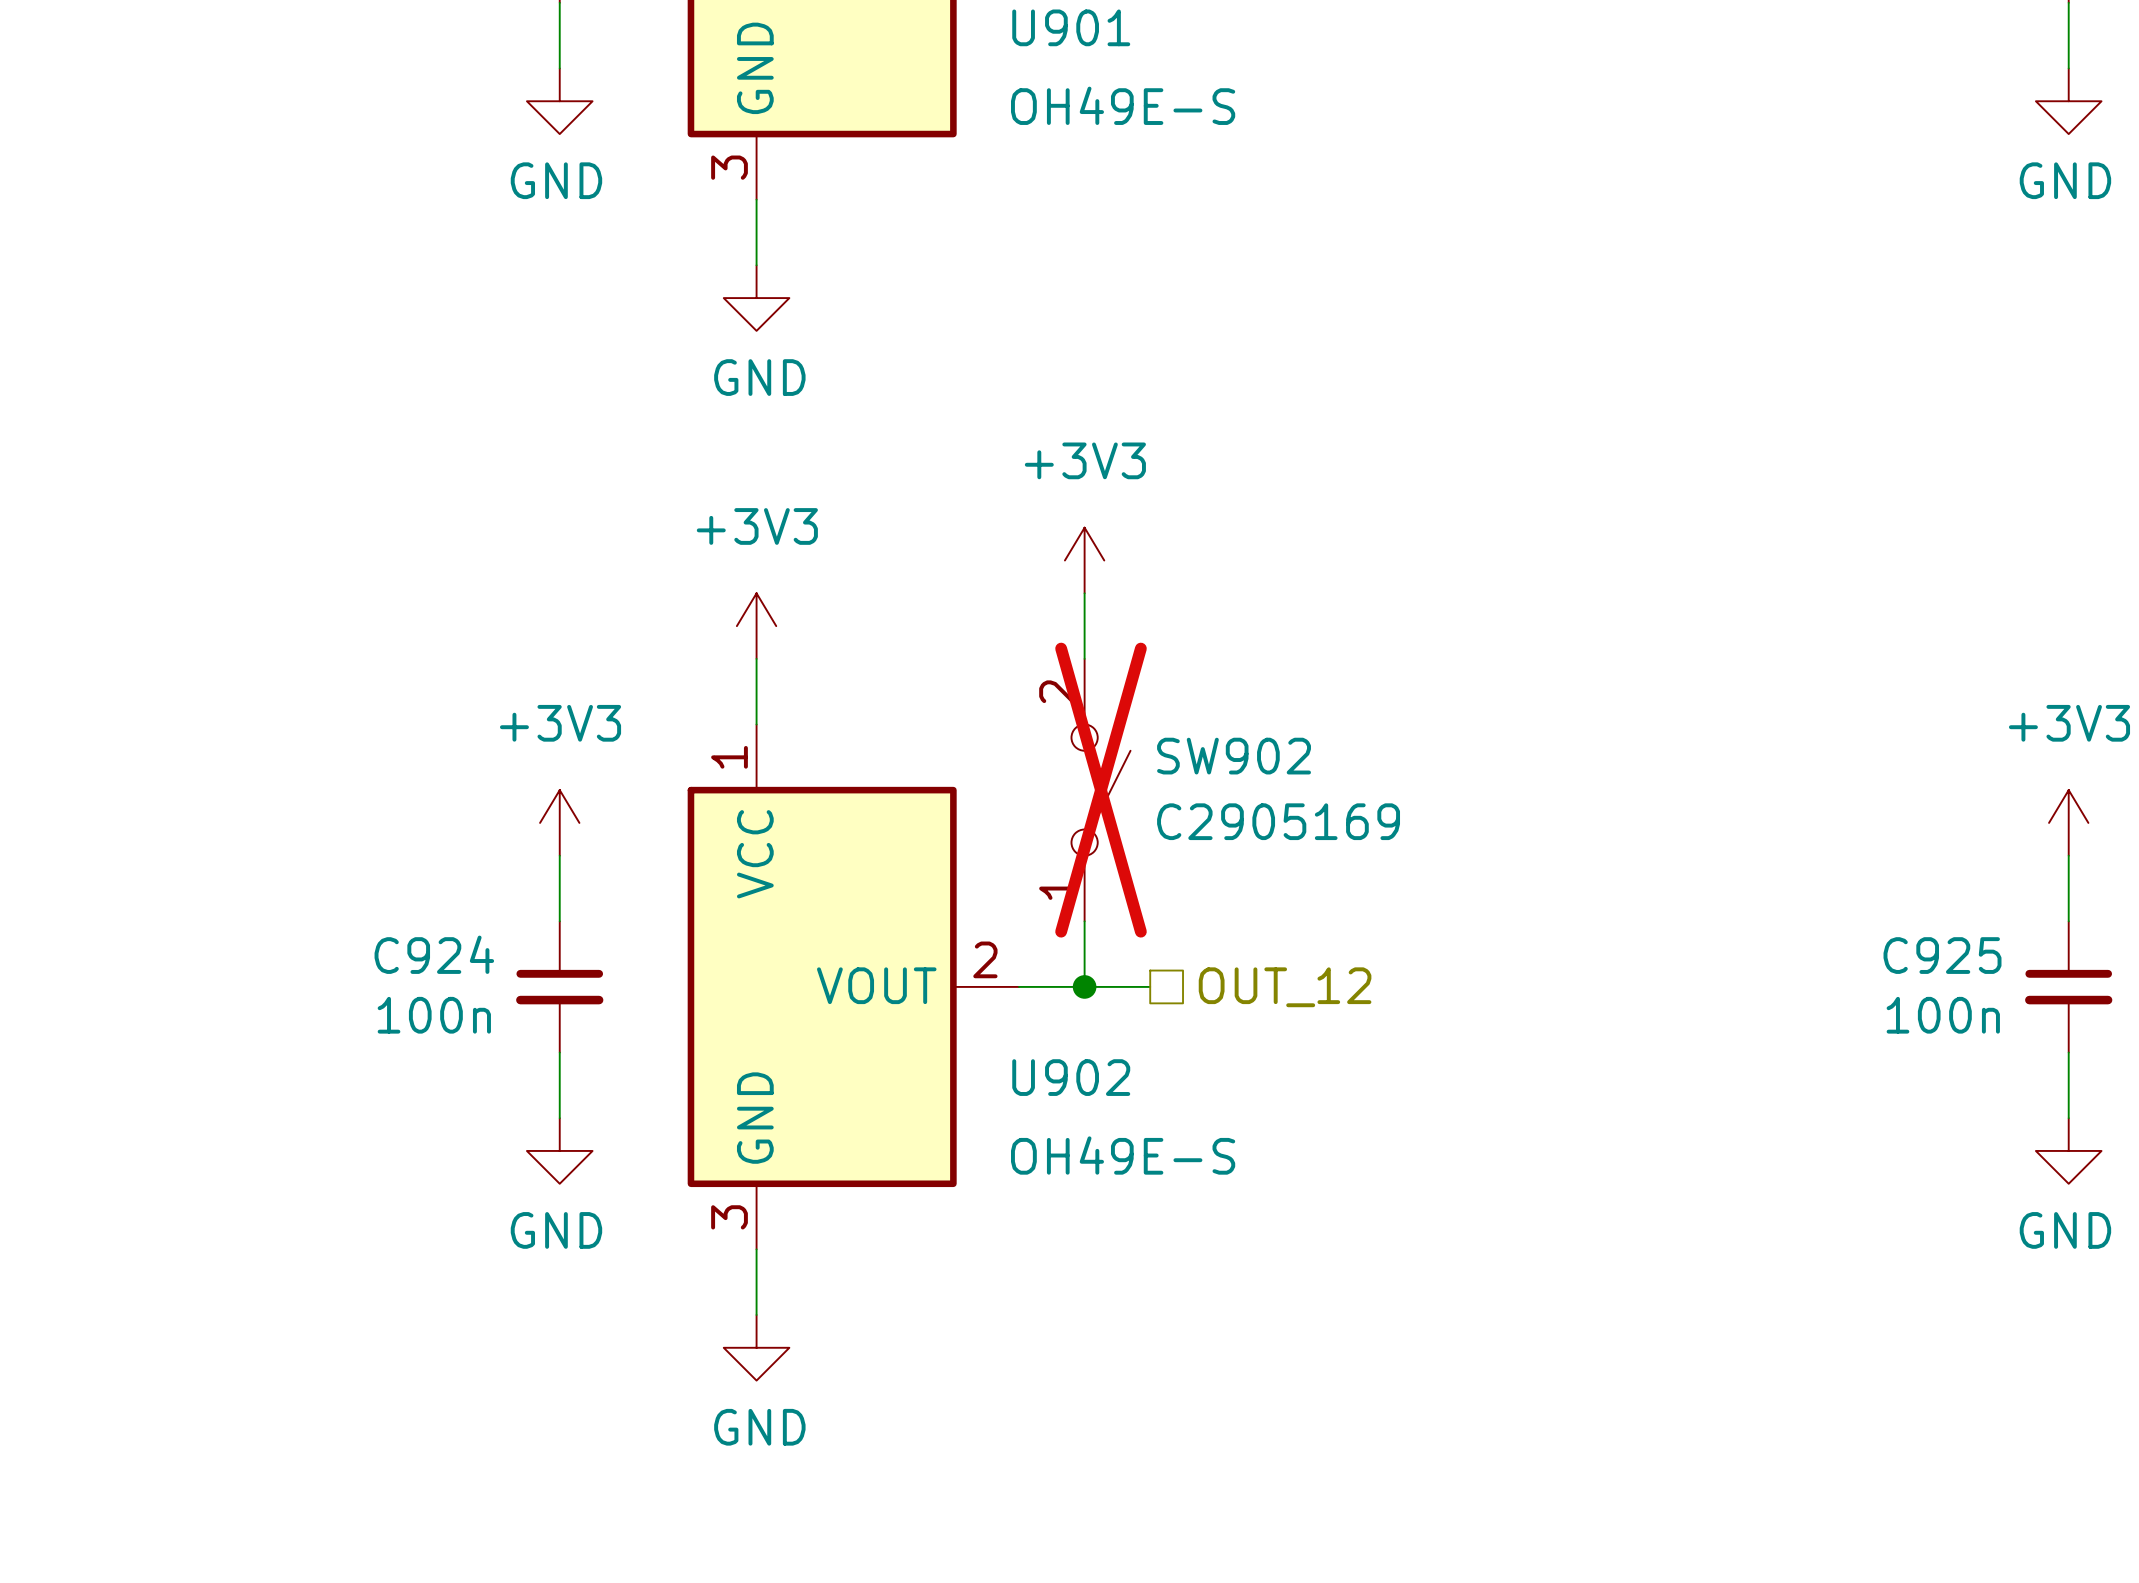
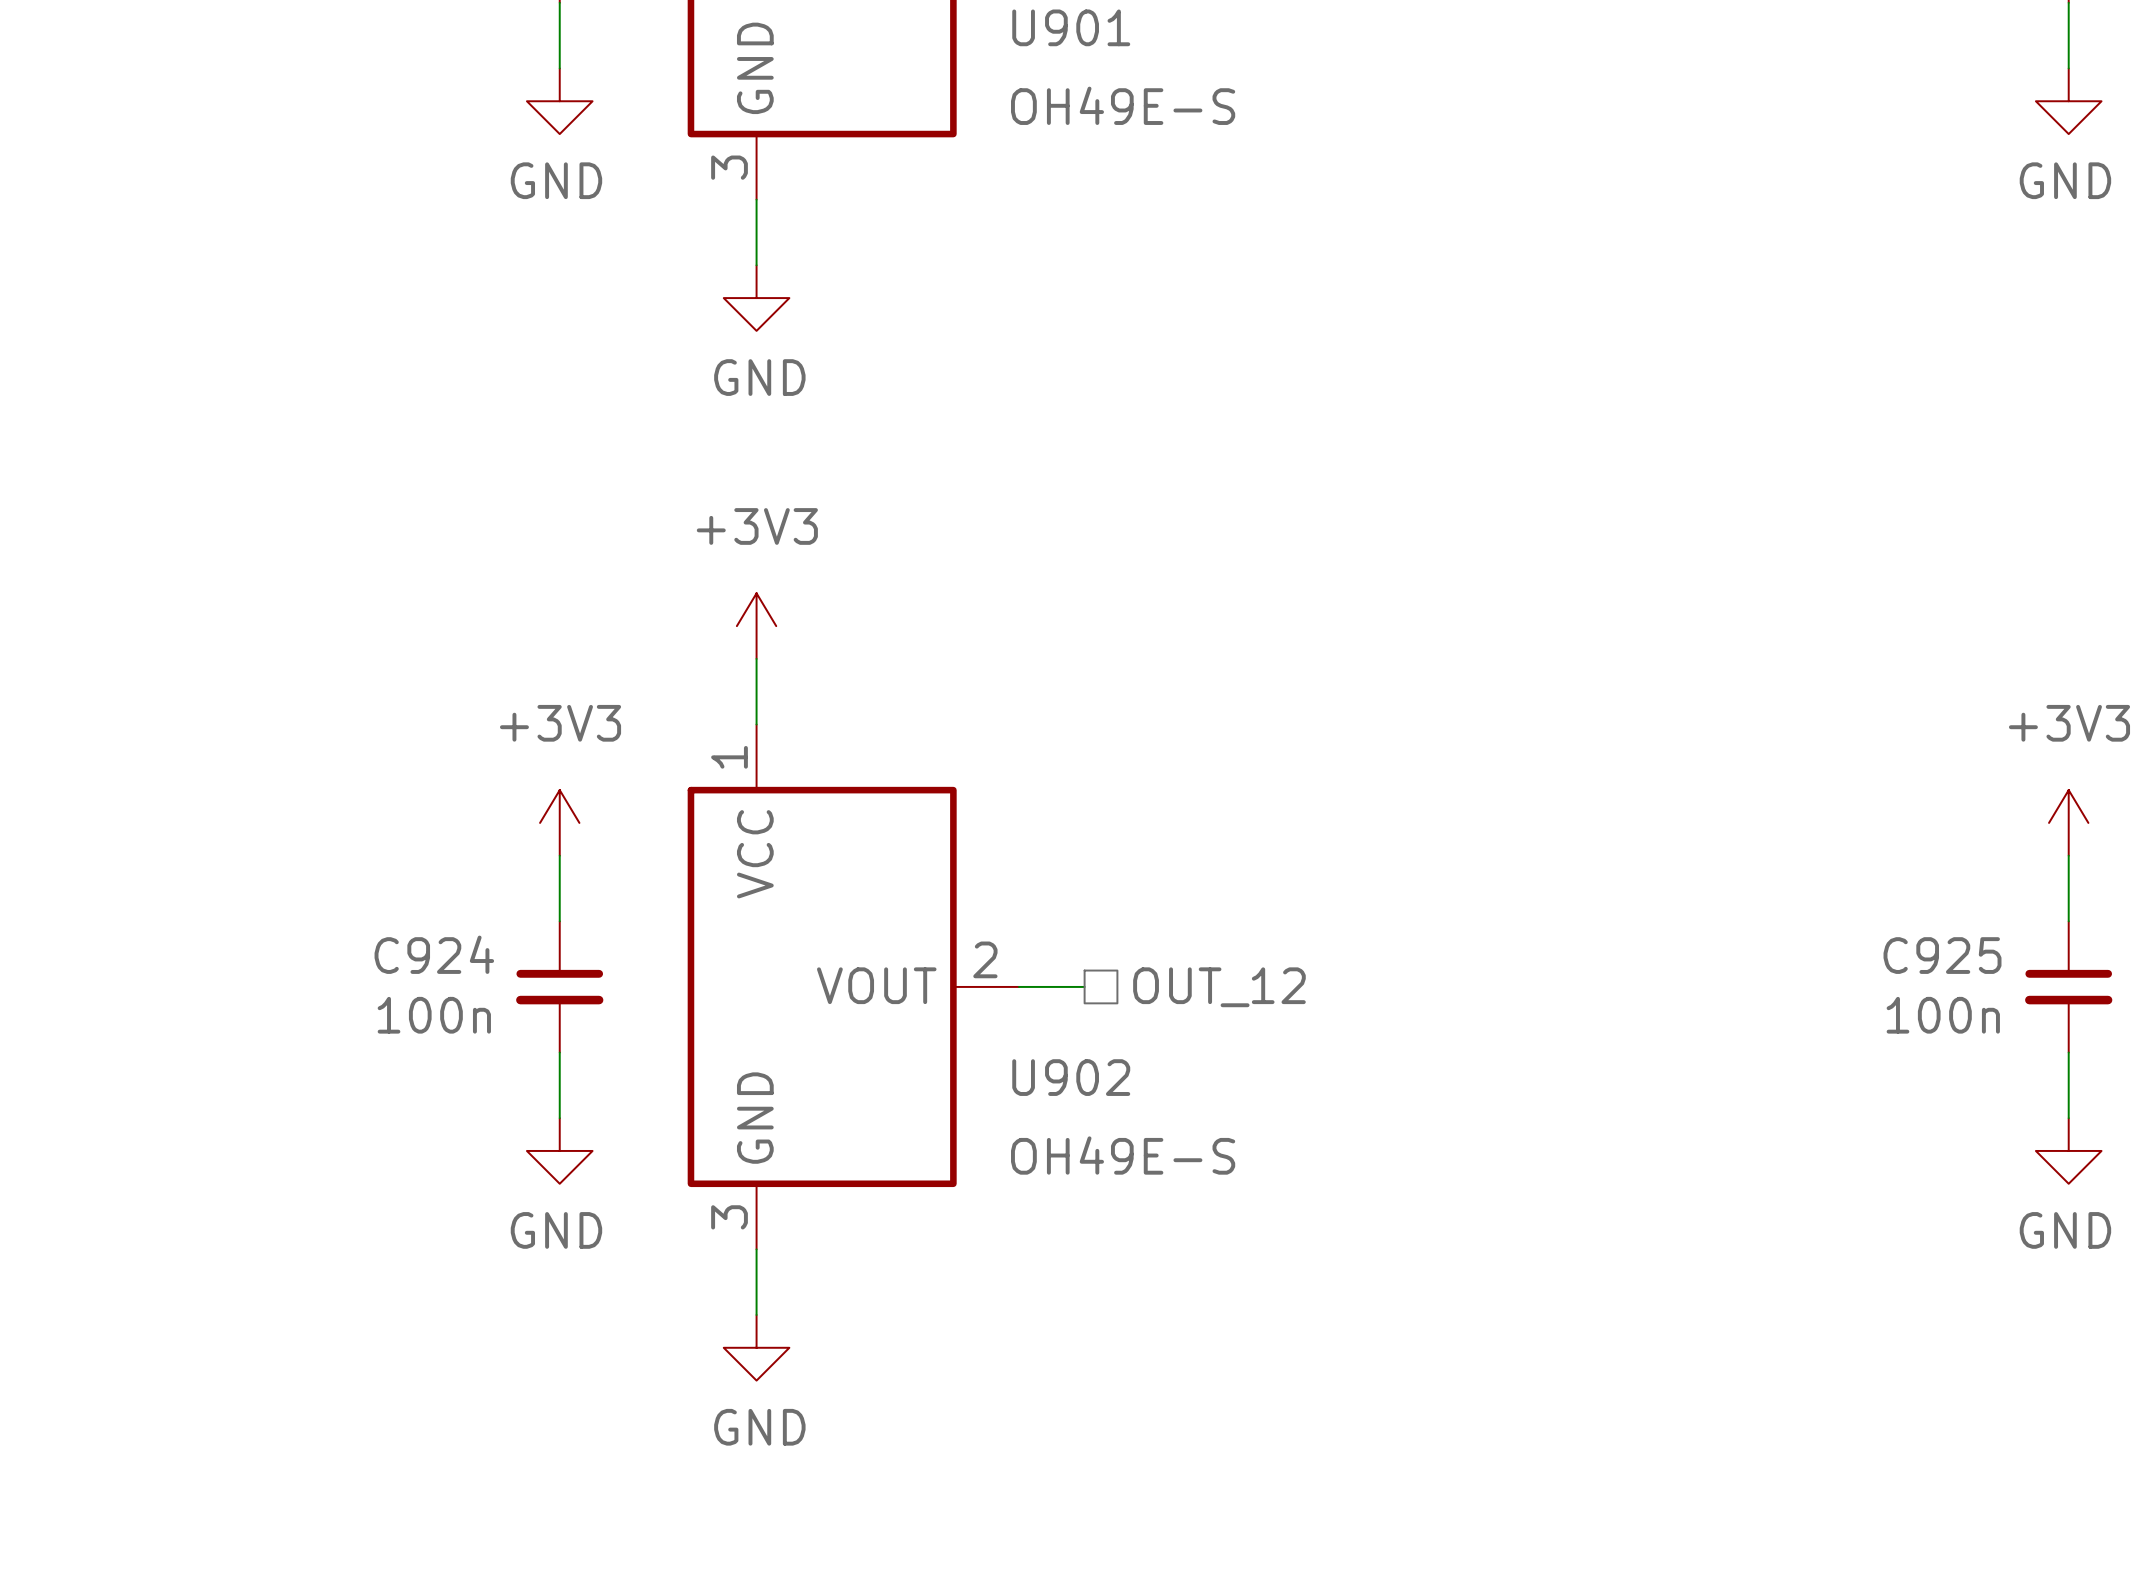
power symbol: +3V3 (1084, 560) -> none
wire: (1084, 593) (1084, 658) -> none
SW902: C2905169 (1101, 790) -> none
wire: (1084, 921) (1084, 986) (1150, 986) -> none
junction: (1084, 986) -> none
hierarchical label position: OUT_12 (1285, 987) -> OUT_12 (1219, 987)

